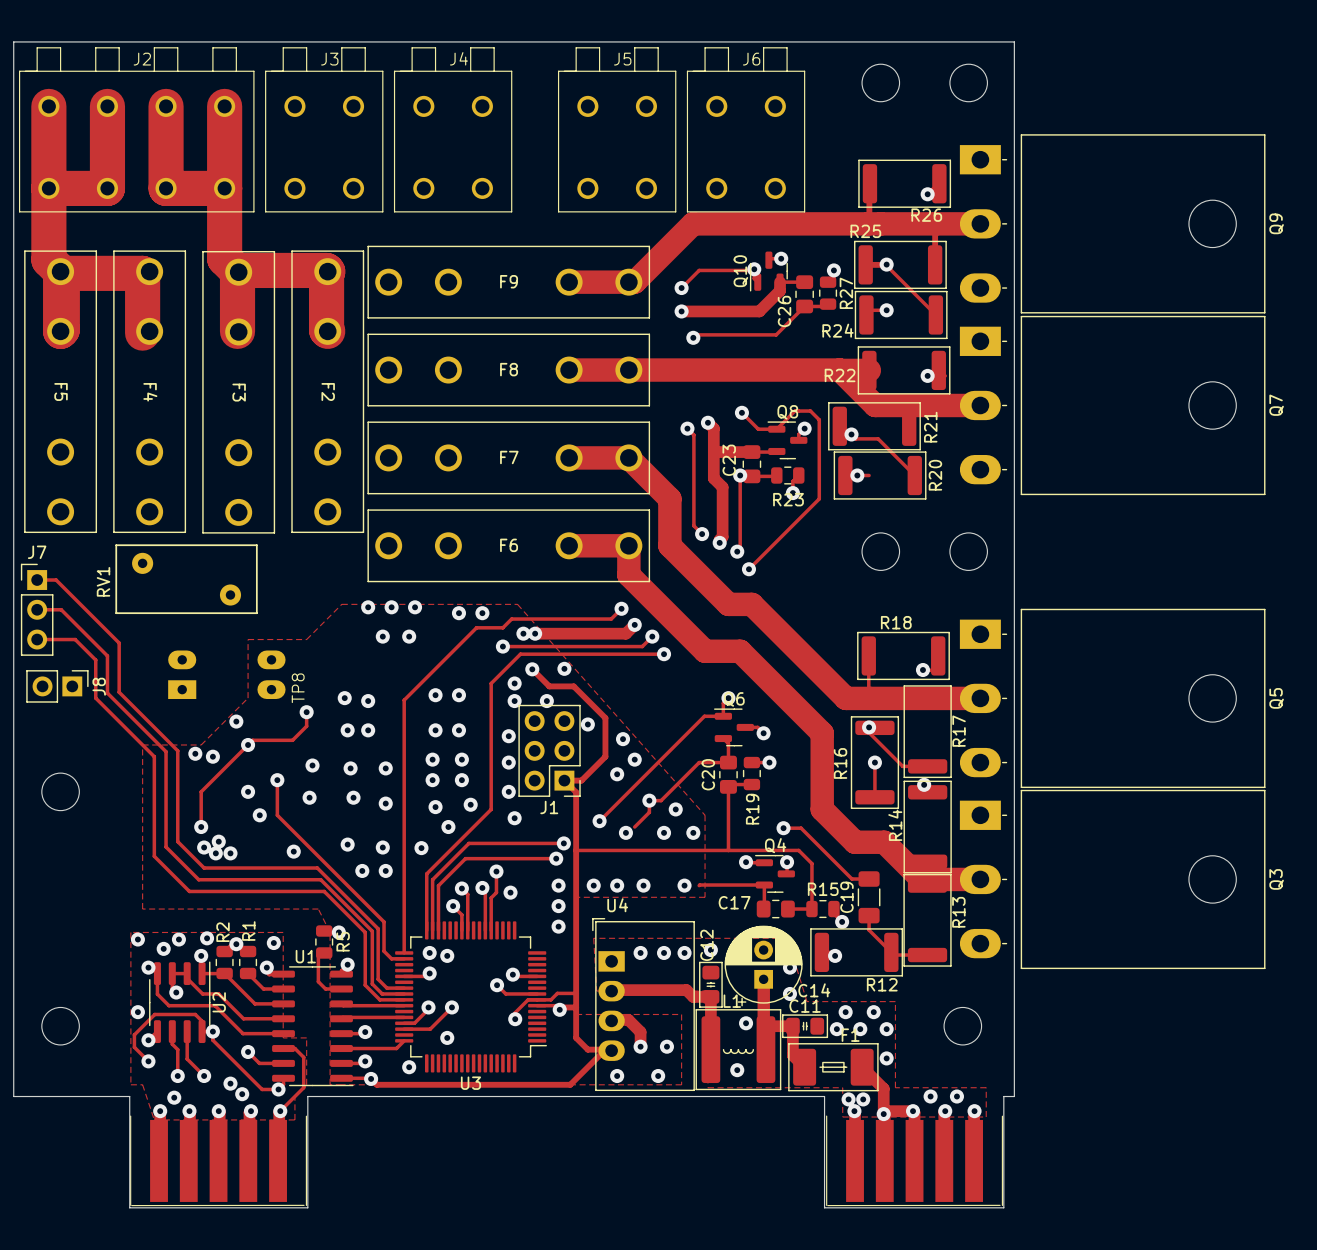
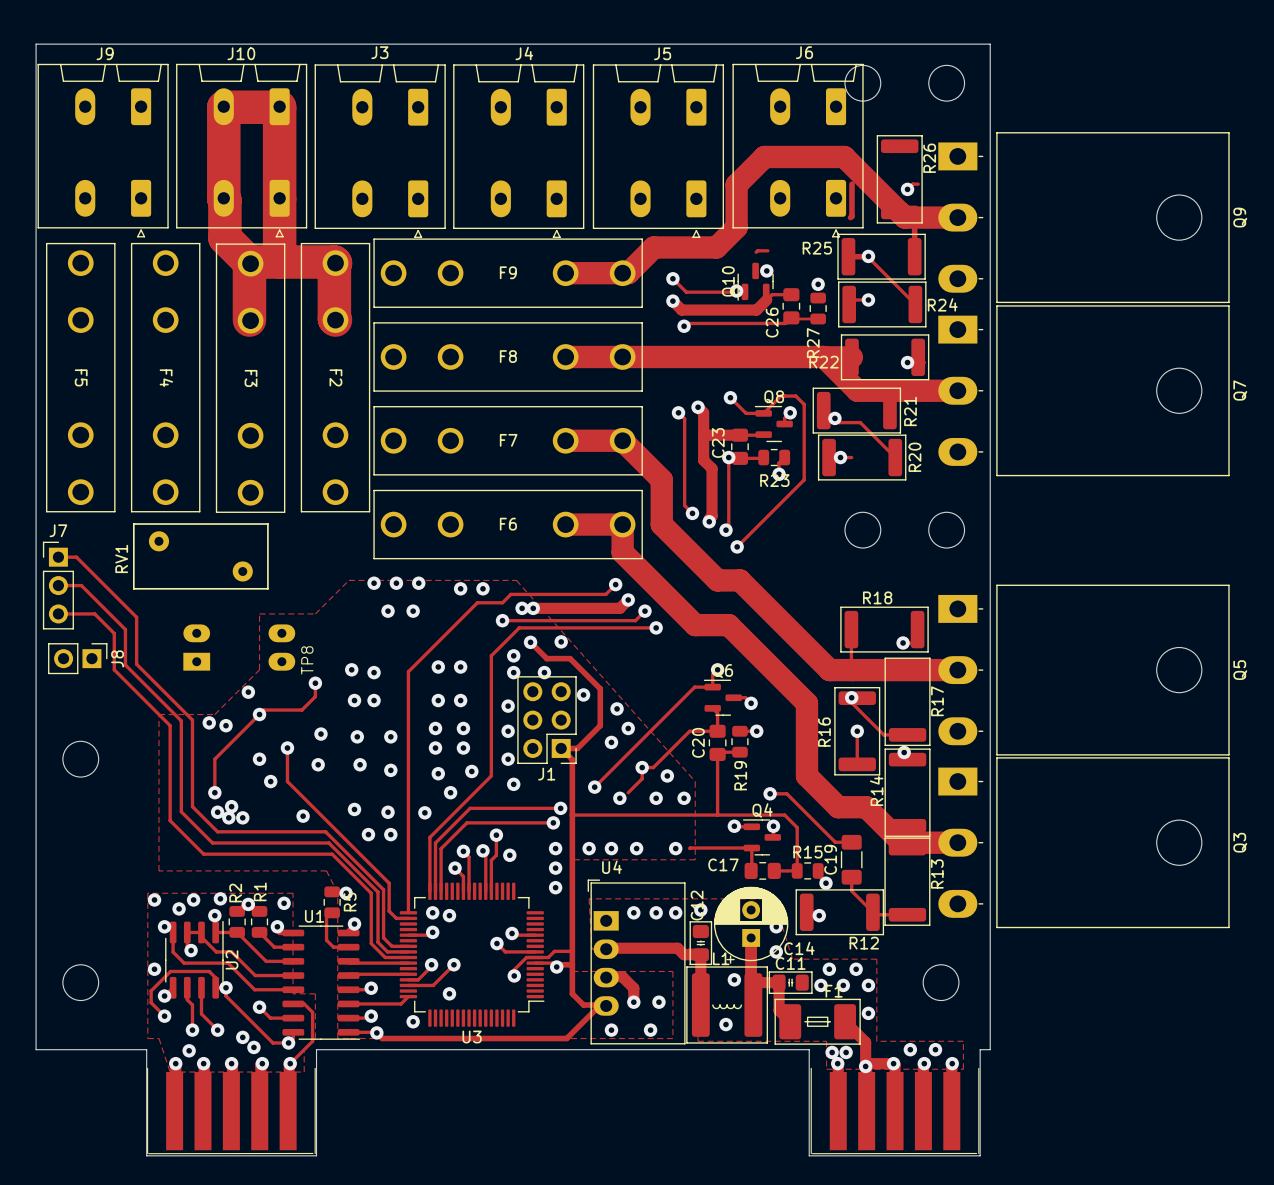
J3 footprint: [265, 47, 384, 213] -> [314, 64, 446, 238]
J4 footprint: [393, 47, 513, 213] -> [453, 64, 585, 238]
J5 footprint: [557, 47, 677, 213] -> [592, 64, 724, 238]
J6 footprint: [686, 47, 806, 213] -> [732, 63, 864, 238]
J4 name position: J4 (458, 58) -> J4 (524, 53)
J3 name position: J3 (329, 59) -> J3 (379, 52)
J5 name position: J5 (622, 59) -> J5 (662, 53)
J6 name position: J6 (751, 59) -> J6 (804, 52)
track: (48, 106) (48, 259) (62, 273) -> none
track: (107, 106) (107, 188) (48, 188) -> none
track: (166, 106) (166, 188) (224, 188) -> none
track: (224, 106) (224, 258) (237, 271) -> none
J2: (136, 129) -> none
J9: none -> (103, 150)
J10: none -> (241, 150)
R26 rotation: 0° (904, 183) -> 90° clockwise (899, 179)
R26 name position: R26 (926, 215) -> R26 (929, 158)
track: (924, 223) (693, 223) (661, 255) -> (904, 217) (844, 156) (764, 156) (736, 184) (736, 227) (716, 247) (653, 247)
R25 name position: R25 (865, 231) -> R25 (817, 248)
via: (781, 258) -> none
via: (754, 269) -> none
track: none -> (280, 262) (279, 107) (223, 107) (224, 237) (250, 263)
via position: (833, 270) -> (818, 284)
Q10 position: (768, 271) -> (755, 281)
track: (62, 273) (62, 329) (60, 331) (60, 275) (62, 273) -> none
track: (62, 273) (142, 273) (142, 333) -> none
via: none -> (766, 270)
track: (757, 282) (754, 278) (754, 269) (699, 270) (681, 288) -> (744, 291) (686, 292) (672, 278)
track: (804, 282) (780, 282) (780, 290) (759, 311) (681, 311) -> (791, 294) (772, 294) (756, 310) (681, 310) (672, 301)
R27 position: (828, 293) -> (818, 308)
R27 name position: R27 (846, 293) -> R27 (813, 343)
C26 position: (804, 294) -> (791, 306)
via: none -> (736, 291)
track: (828, 304) (825, 306) (804, 306) (776, 334) -> (818, 318) (791, 317) (785, 323) (763, 323)
R24 name position: R24 (838, 330) -> R24 (942, 304)

